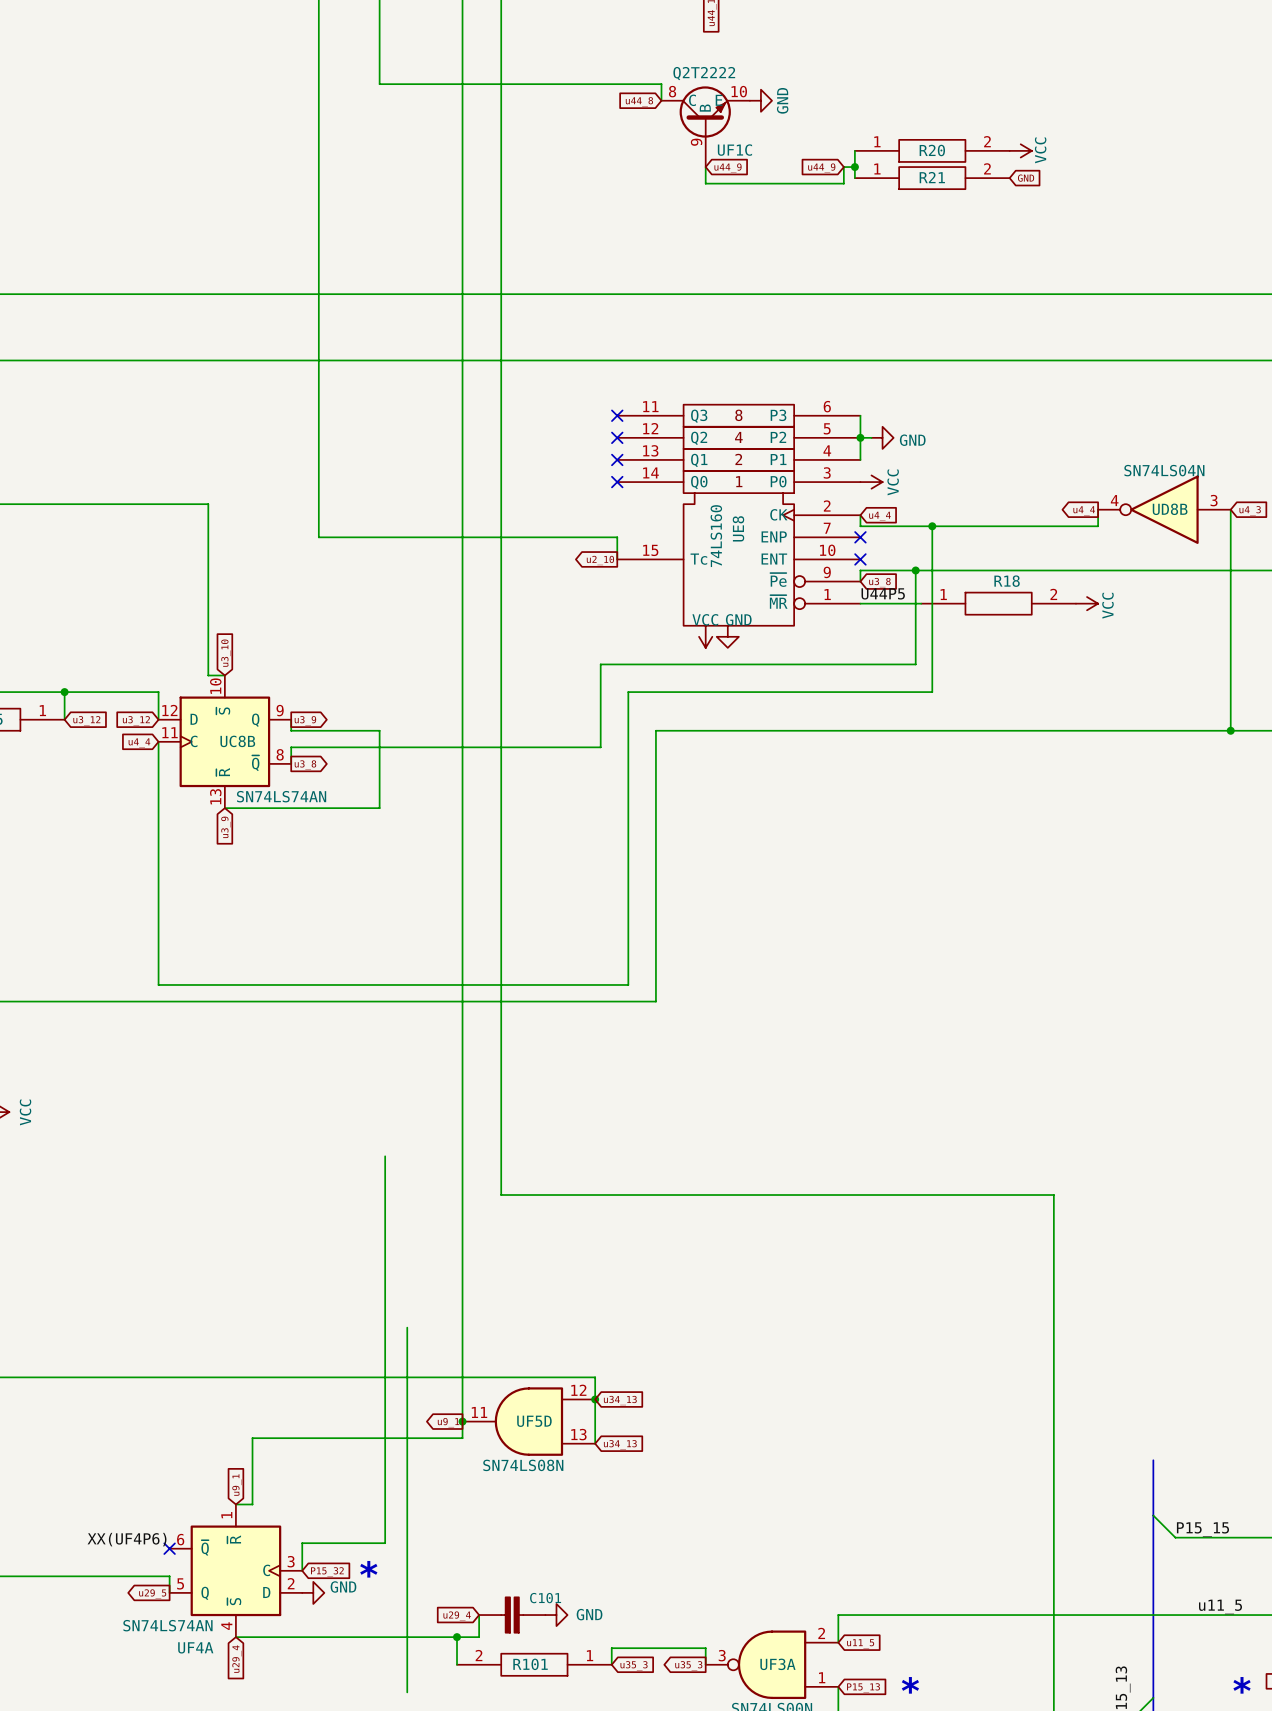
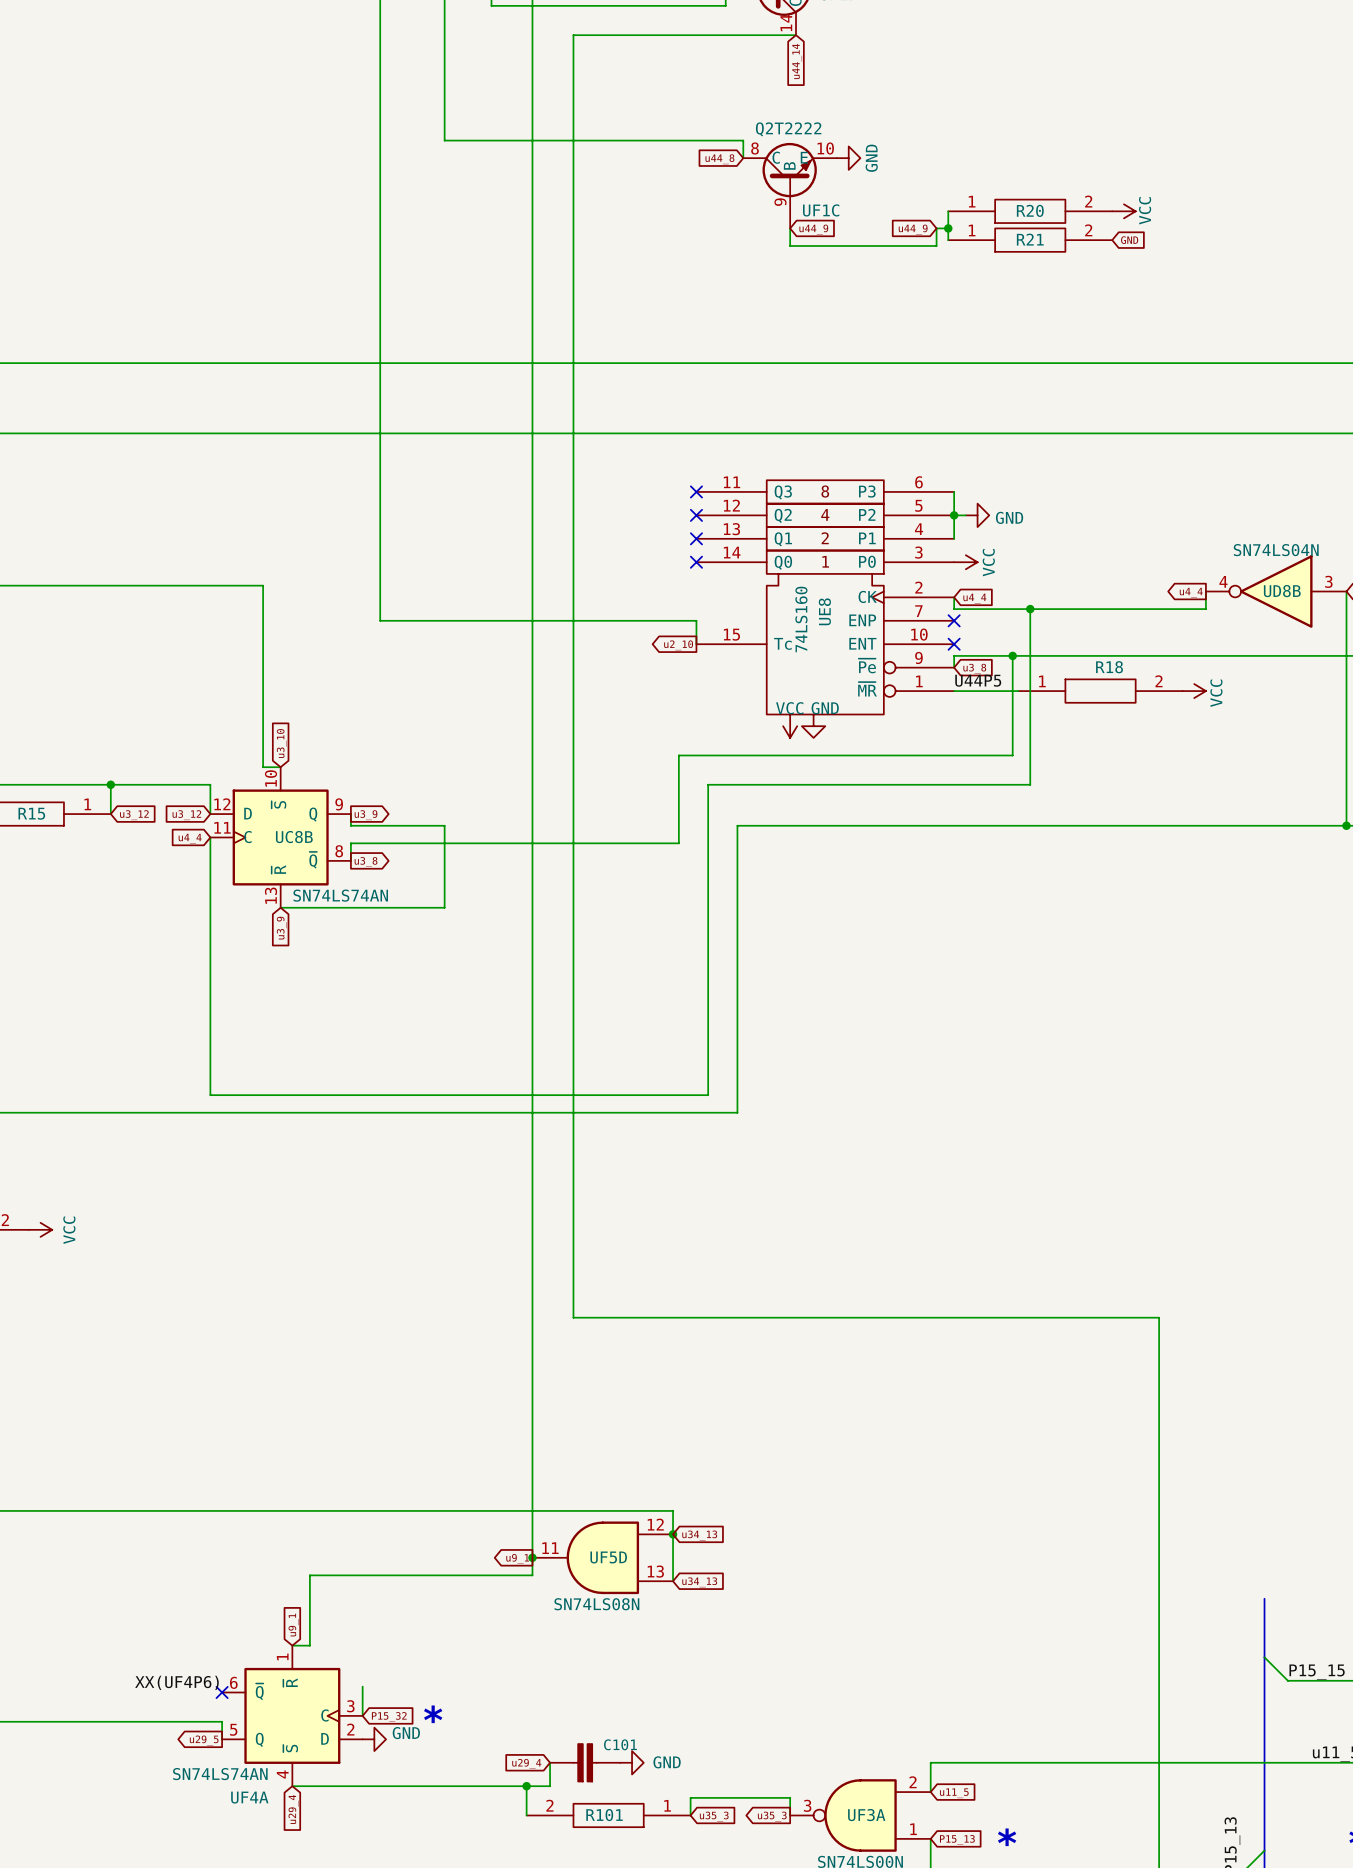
wire: (385, 1156) (385, 1543) (302, 1543) -> none
wire: (407, 1327) (407, 1692) -> none

